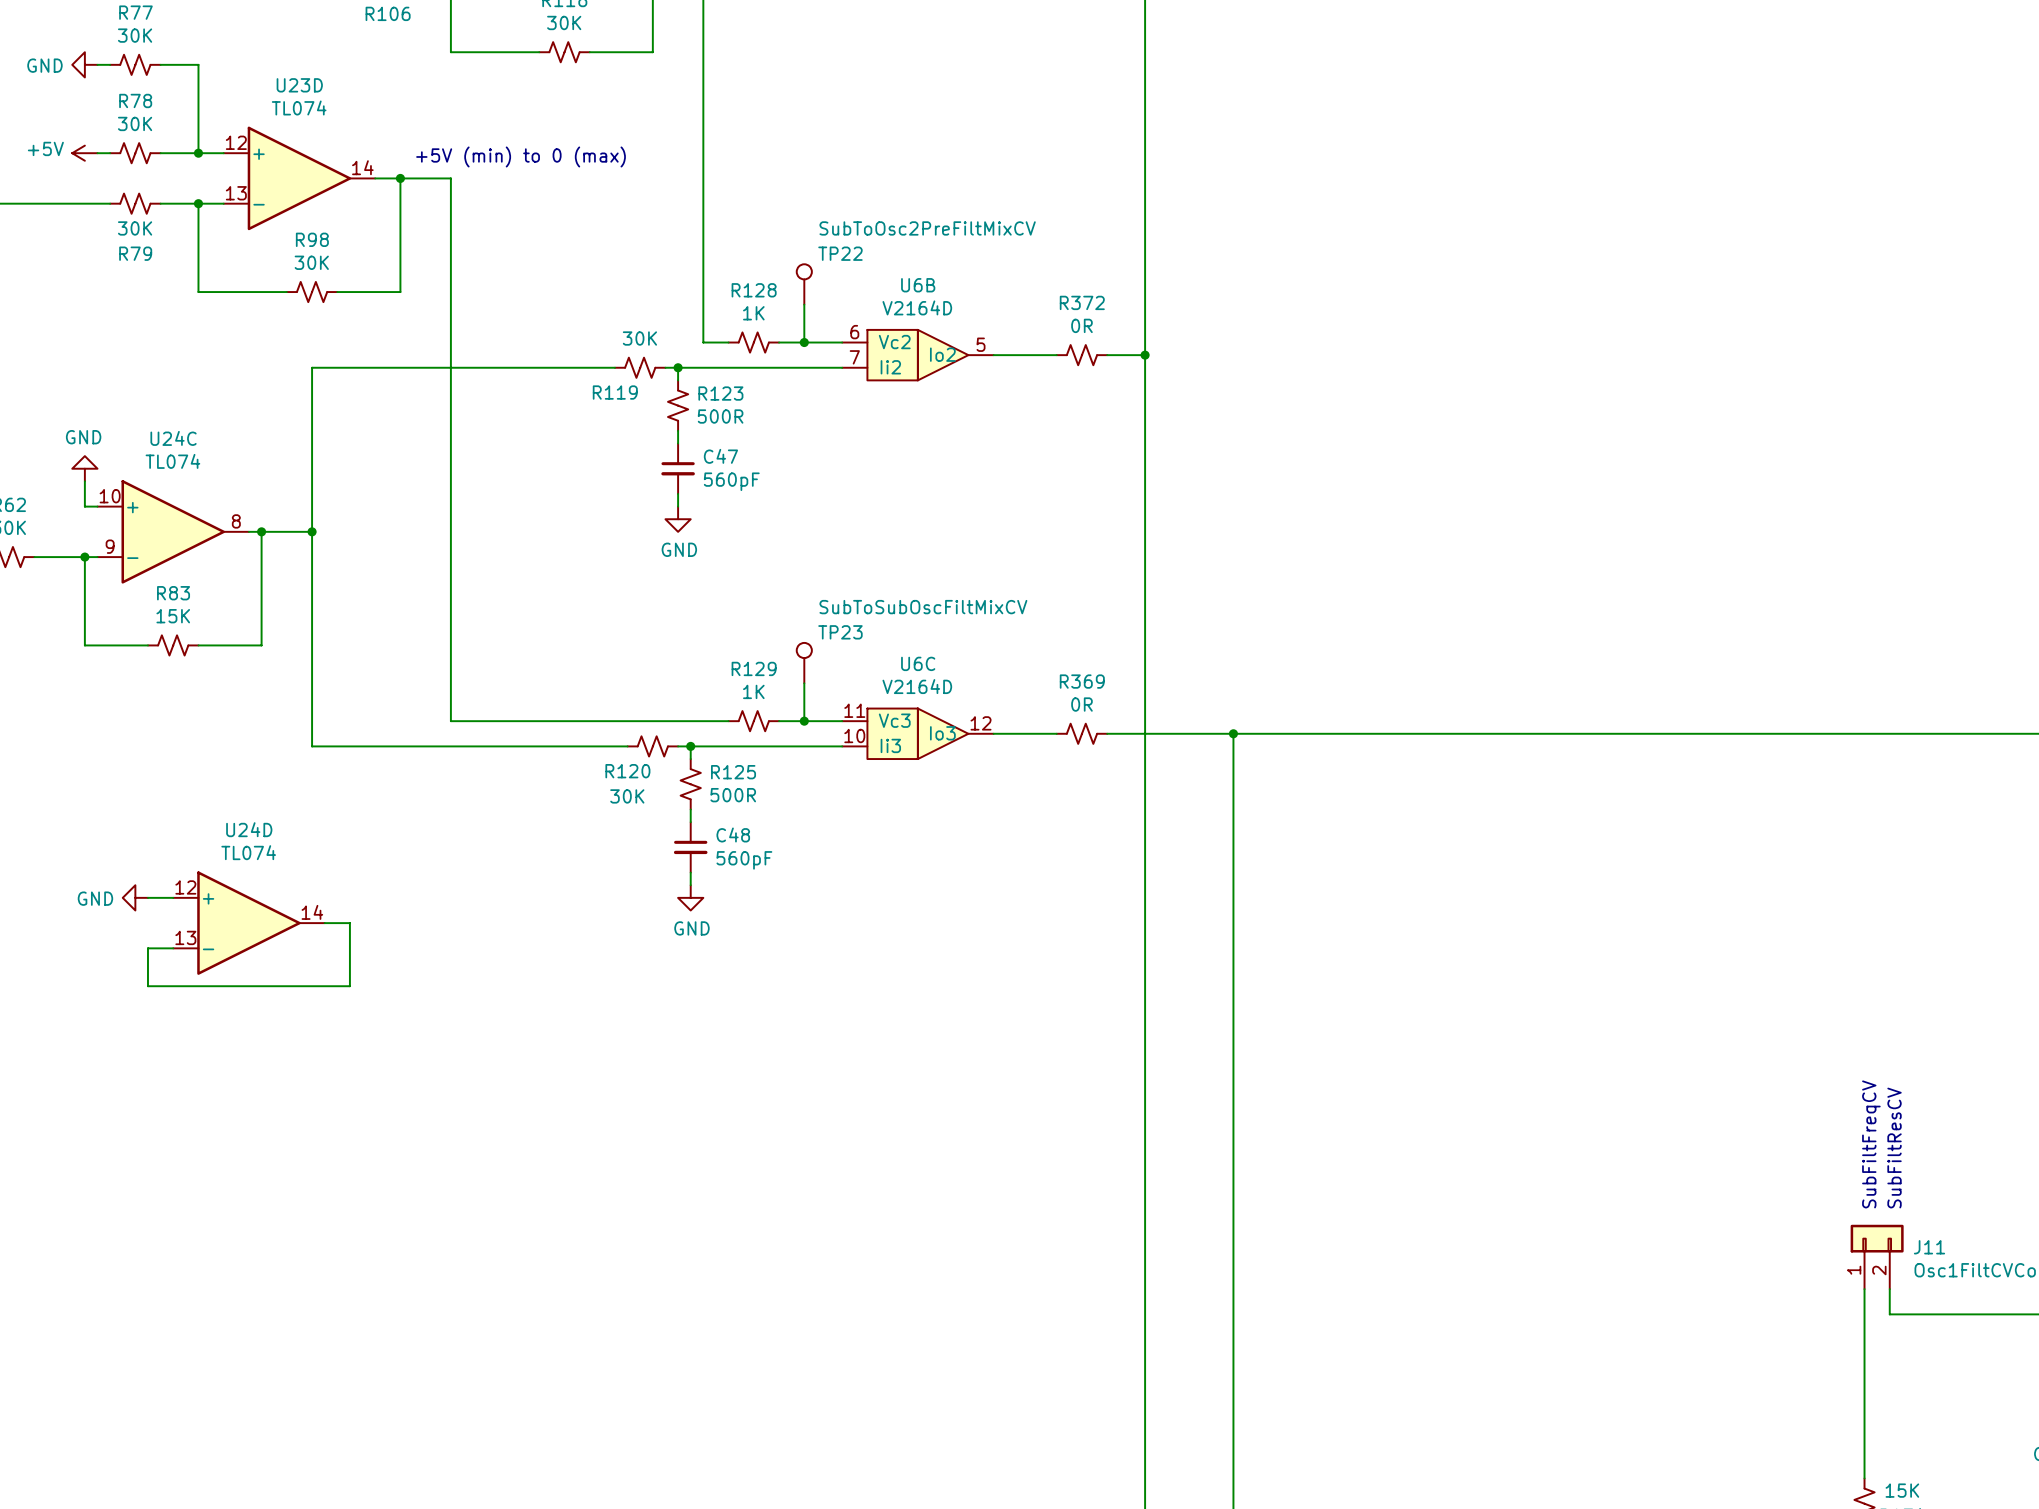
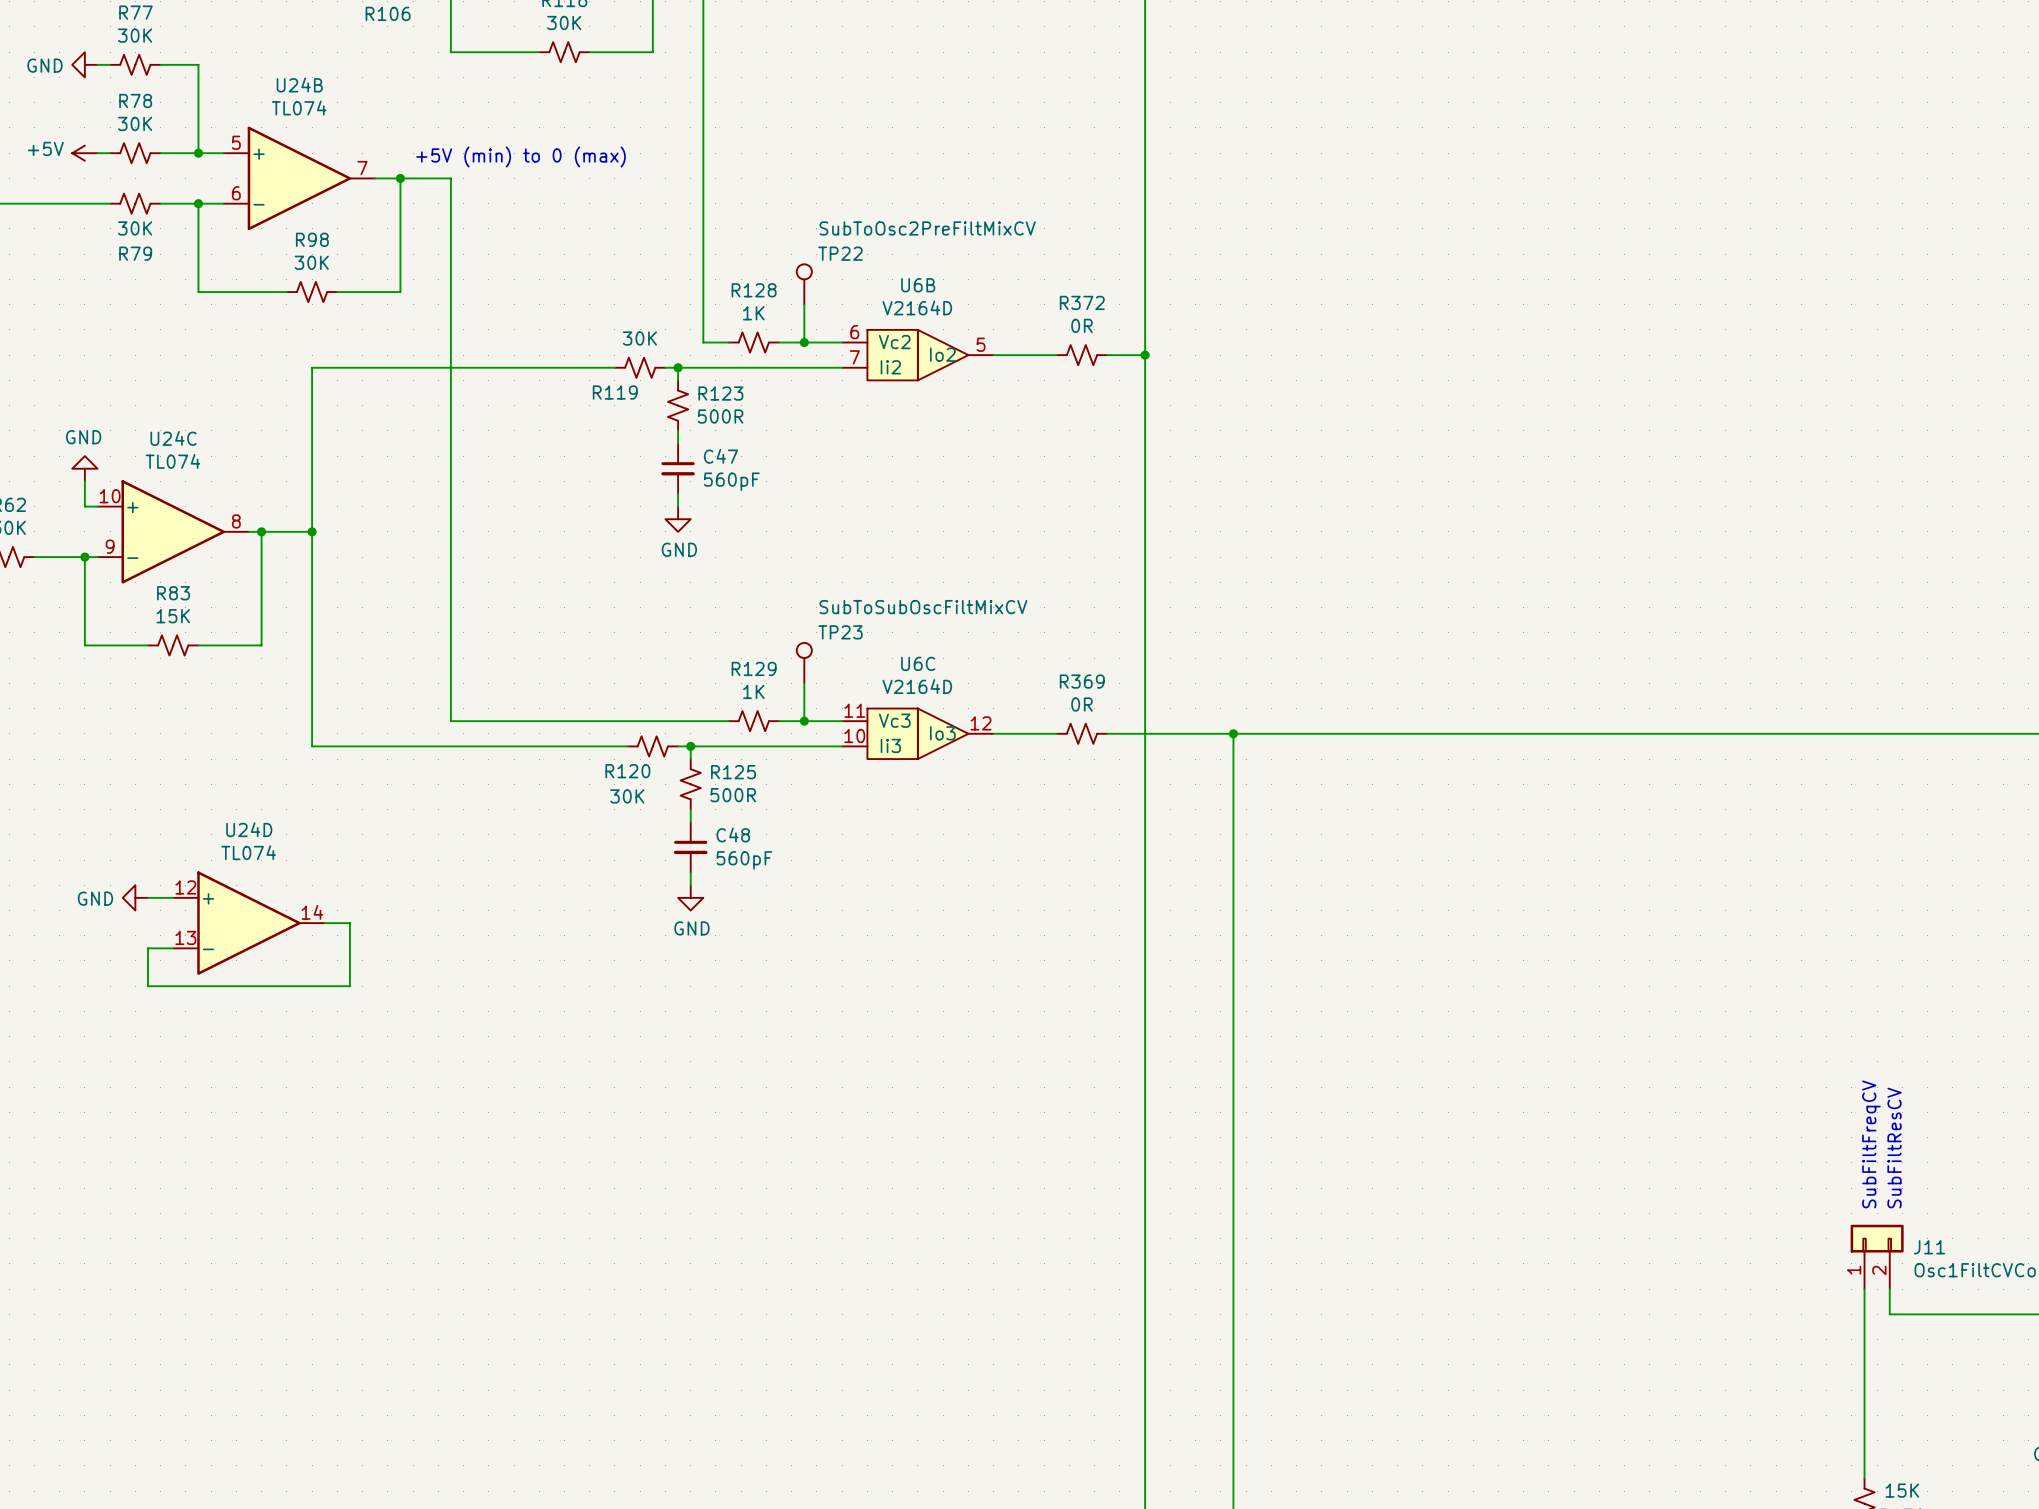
U23D name: U23D (299, 85) -> U24B (299, 85)
U23D pin number: 12 (236, 142) -> 5 (236, 142)
U23D pin number: 14 (362, 167) -> 7 (362, 168)
U23D pin number: 13 (236, 193) -> 6 (236, 193)

